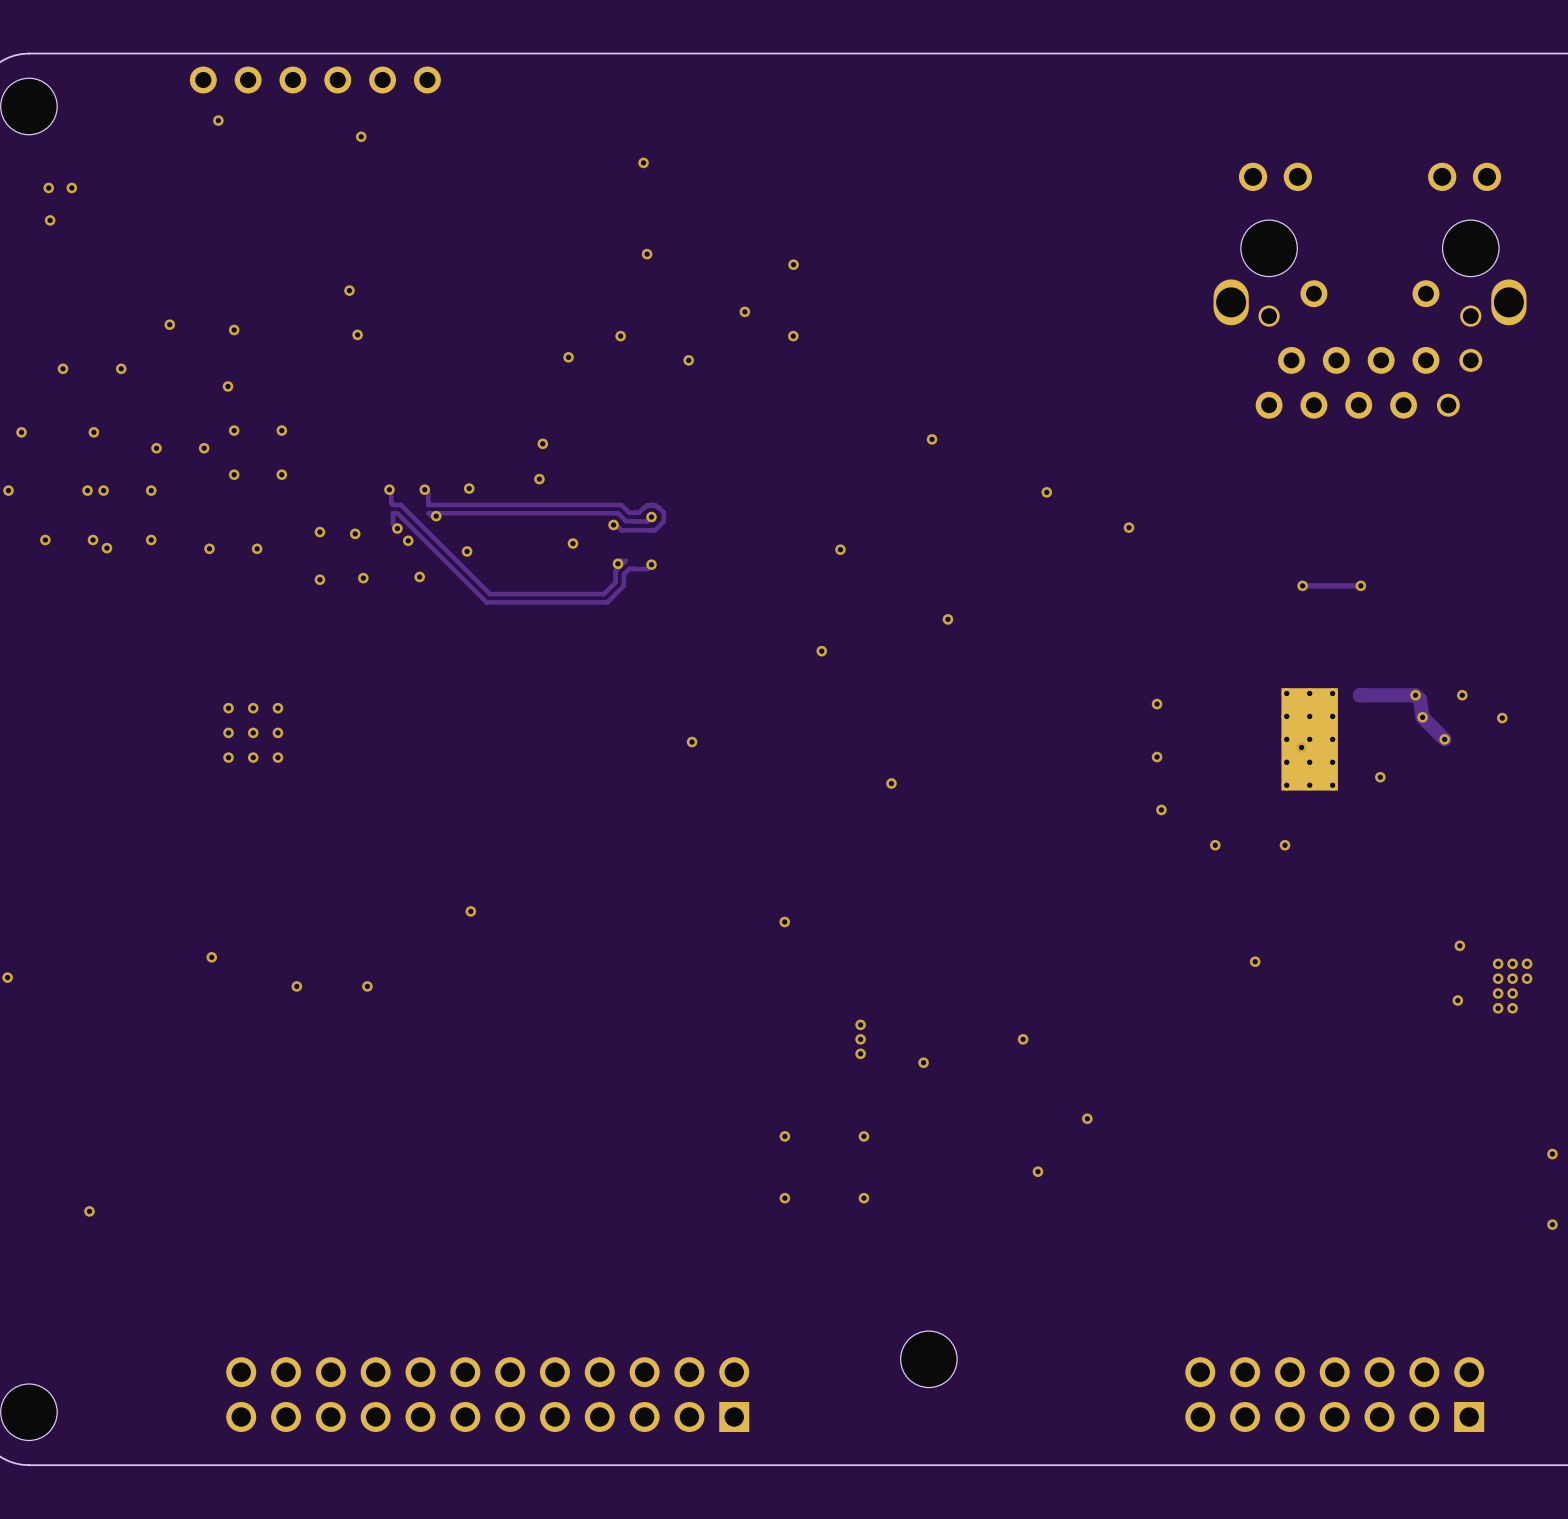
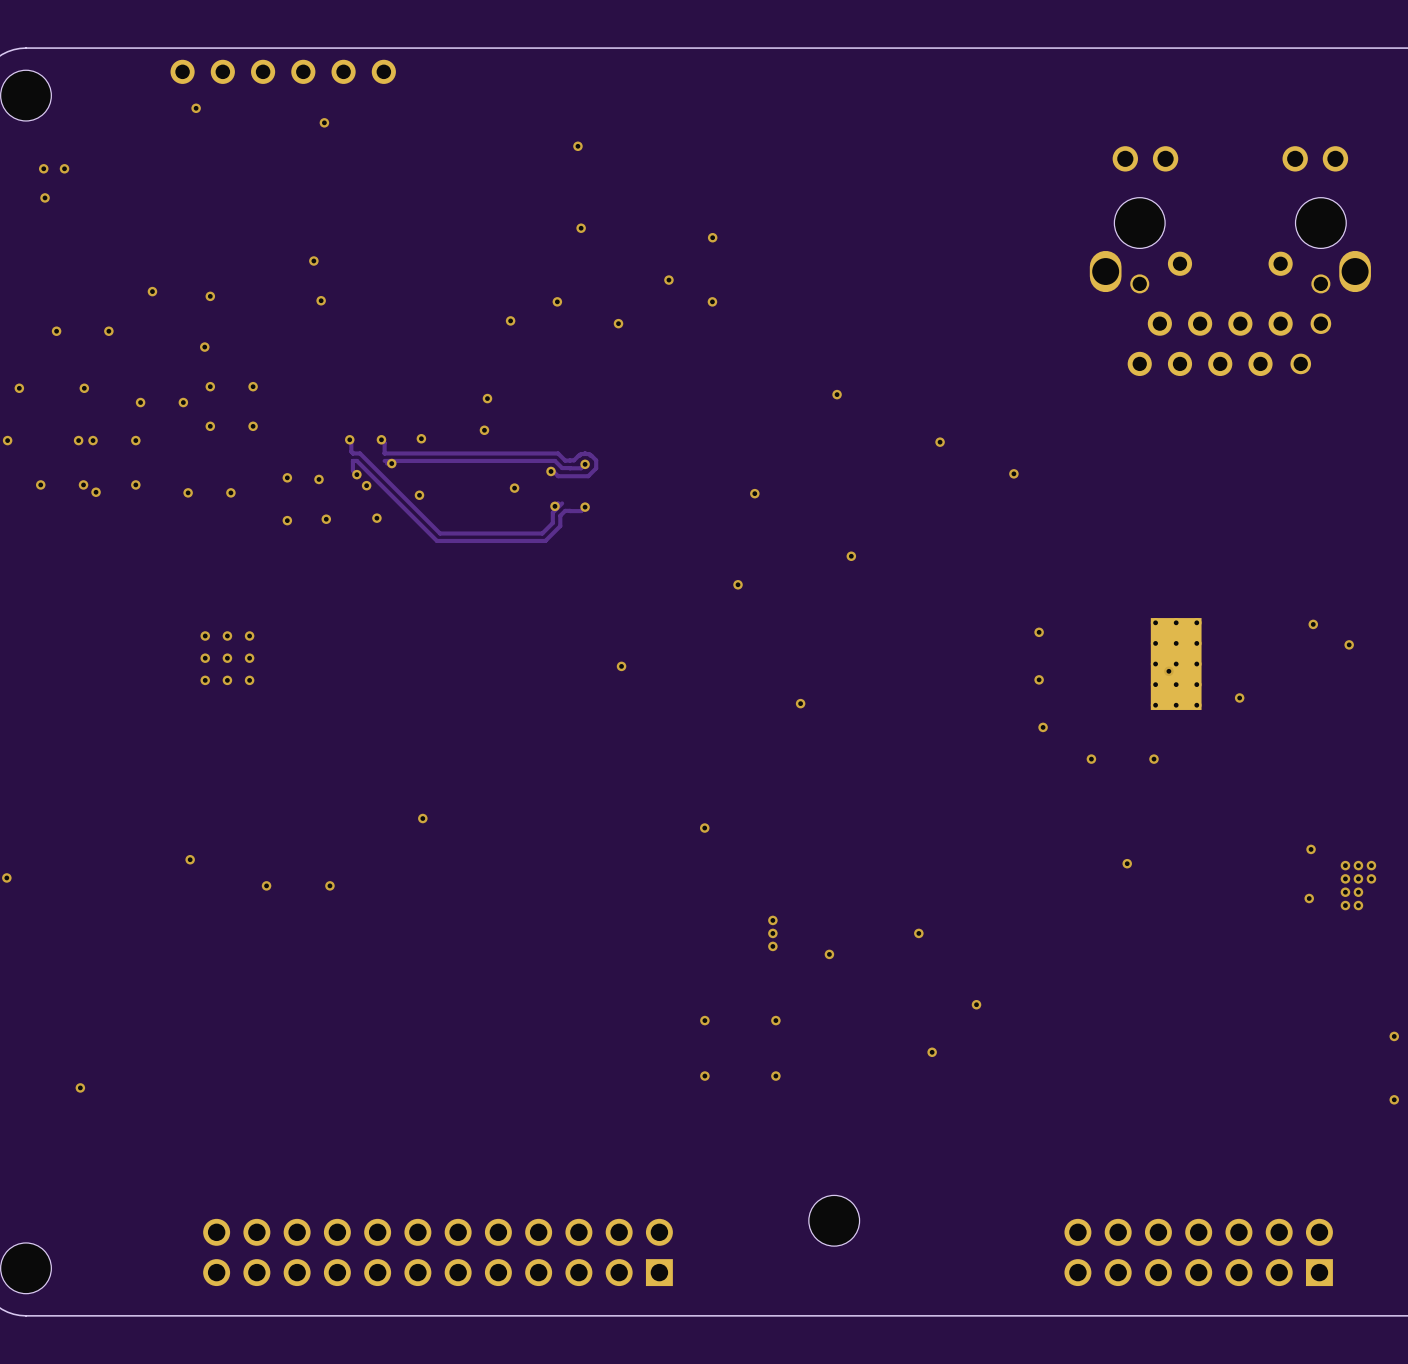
via: (1302, 585) -> none
track: (1360, 585) (1302, 585) -> none
via: (1360, 585) -> none
track: (1415, 695) (1359, 695) (1415, 695) -> none
track: (1415, 695) (1419, 699) (1422, 717) (1444, 739) -> none
via: (1415, 695) -> none
via: (1422, 717) -> none
via: (1444, 739) -> none

